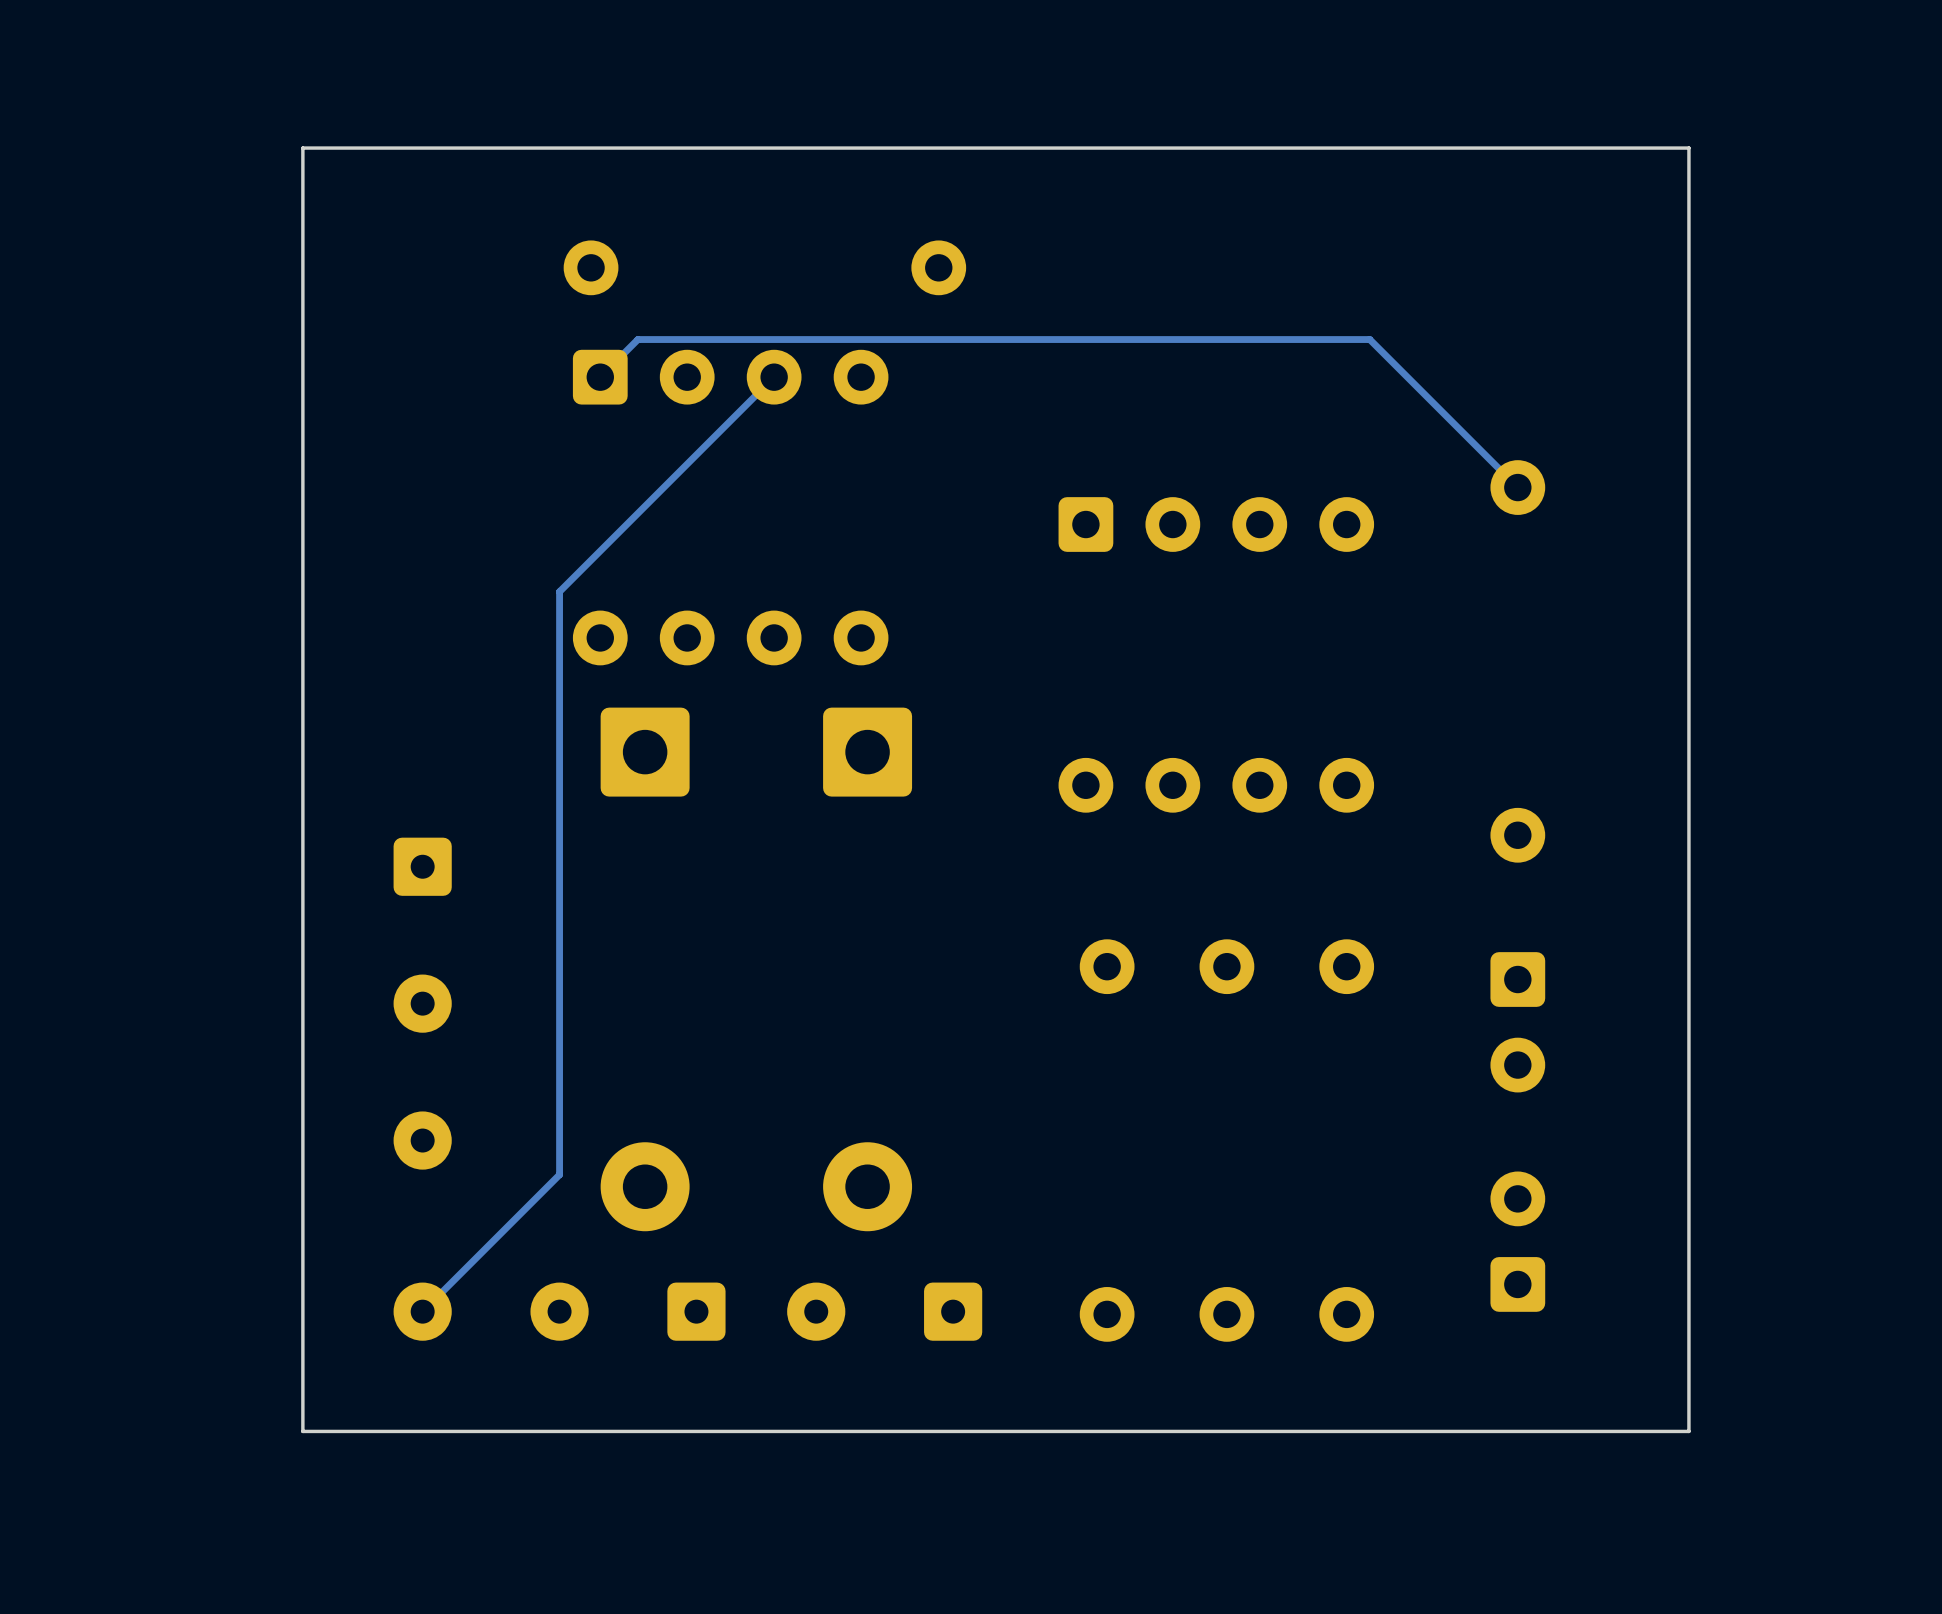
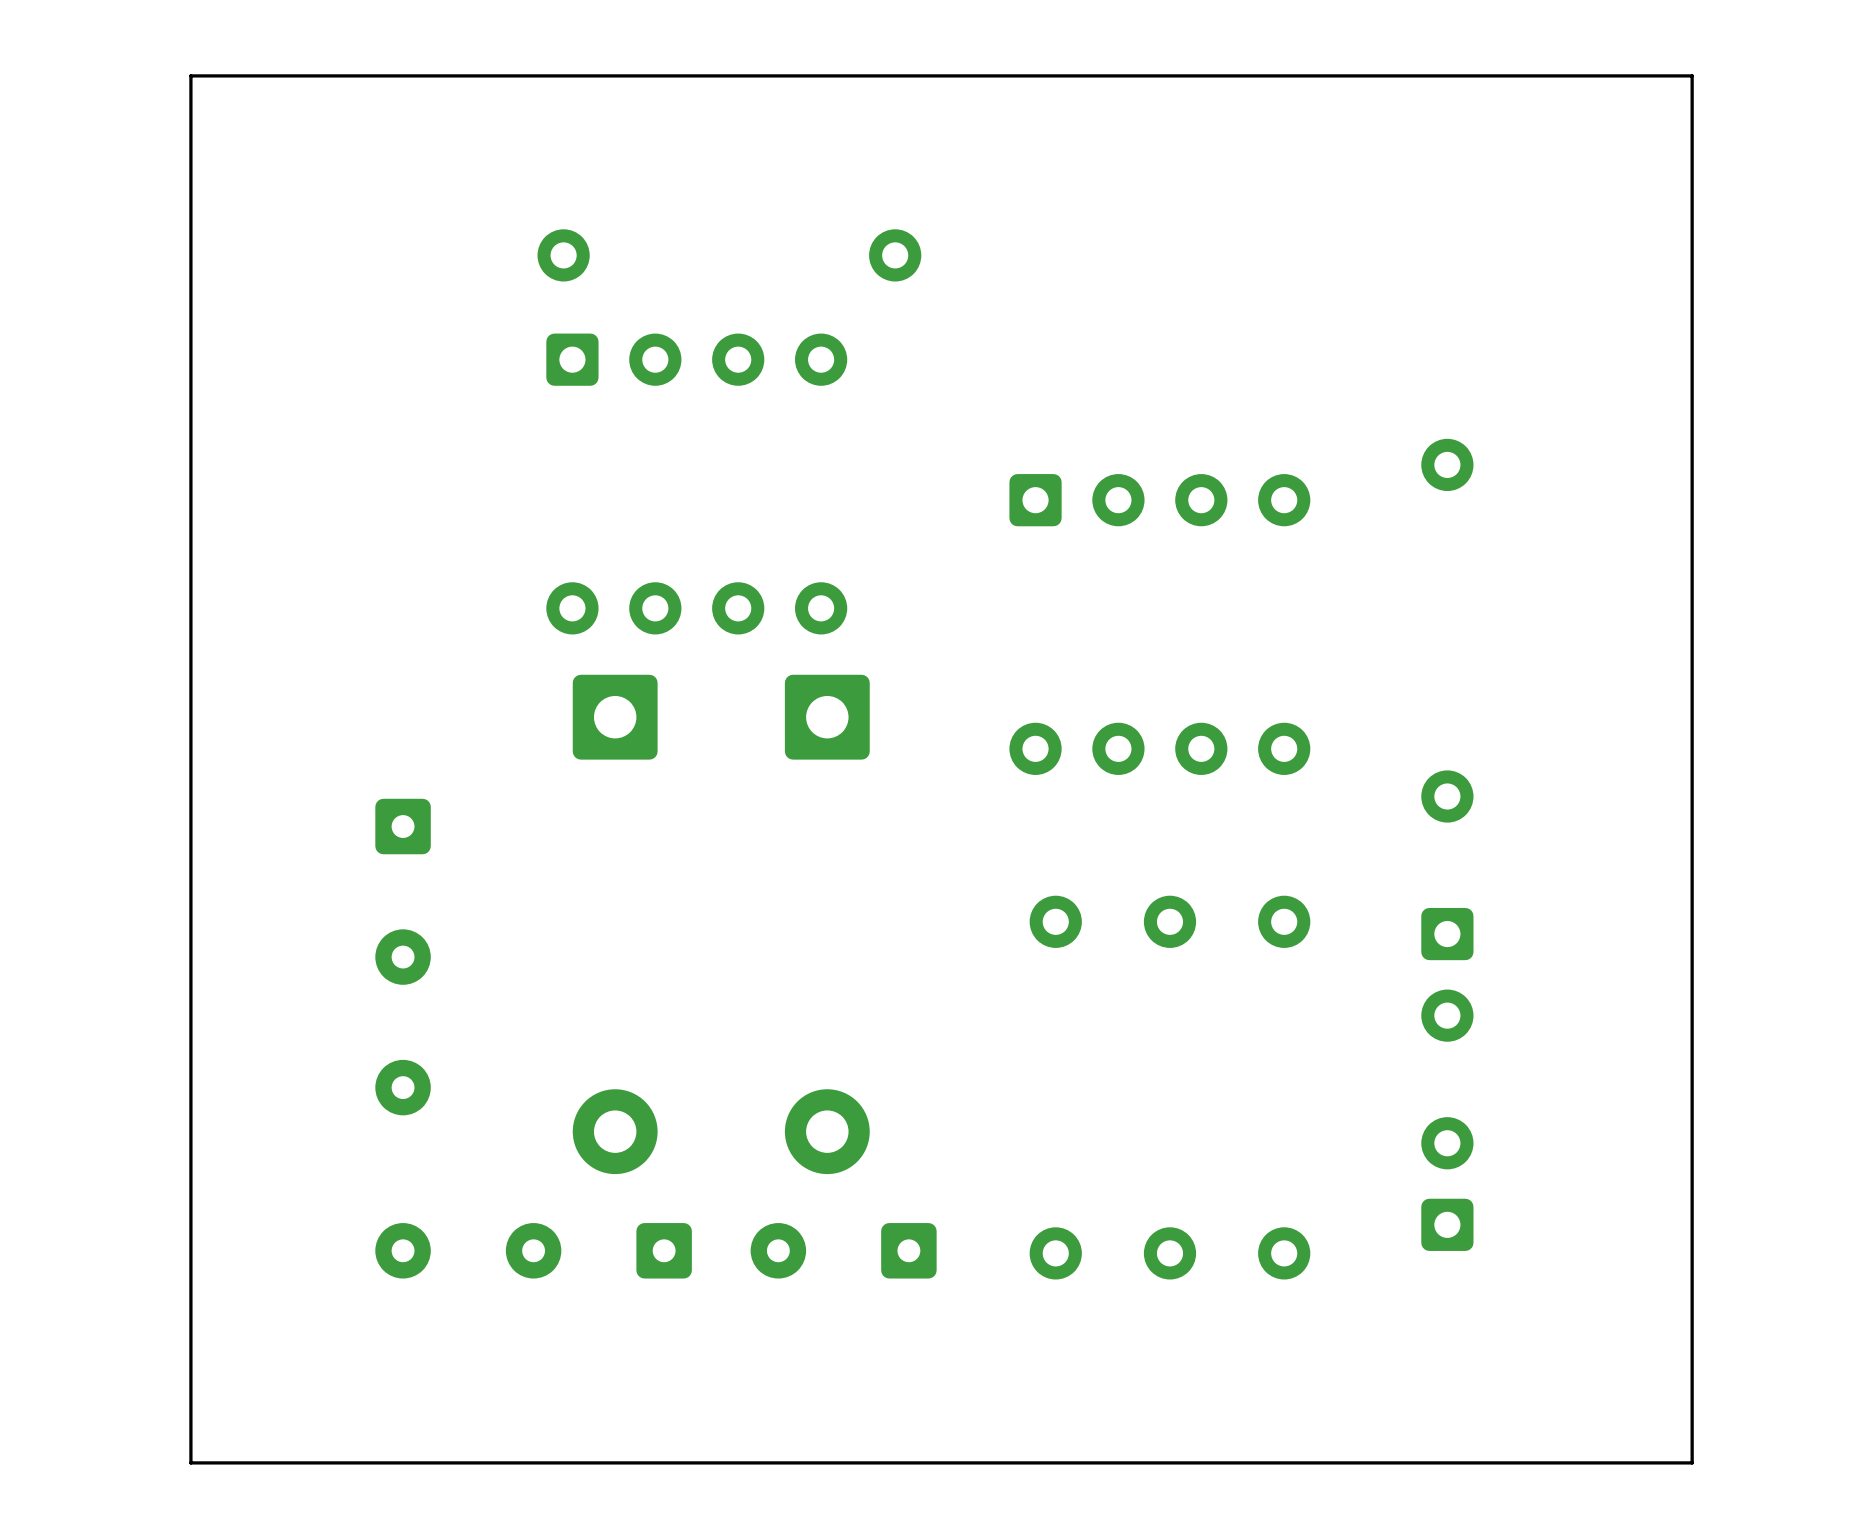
board edge: (1688, 148) (302, 148) (302, 1431) (1688, 1431) (1688, 148) -> (1692, 75) (1692, 1462) (190, 1462) (190, 75) (1692, 75)
track: (600, 377) (637, 339) (1369, 339) (1517, 487) -> none
track: (774, 377) (559, 591) (559, 1174) (422, 1311) -> none

